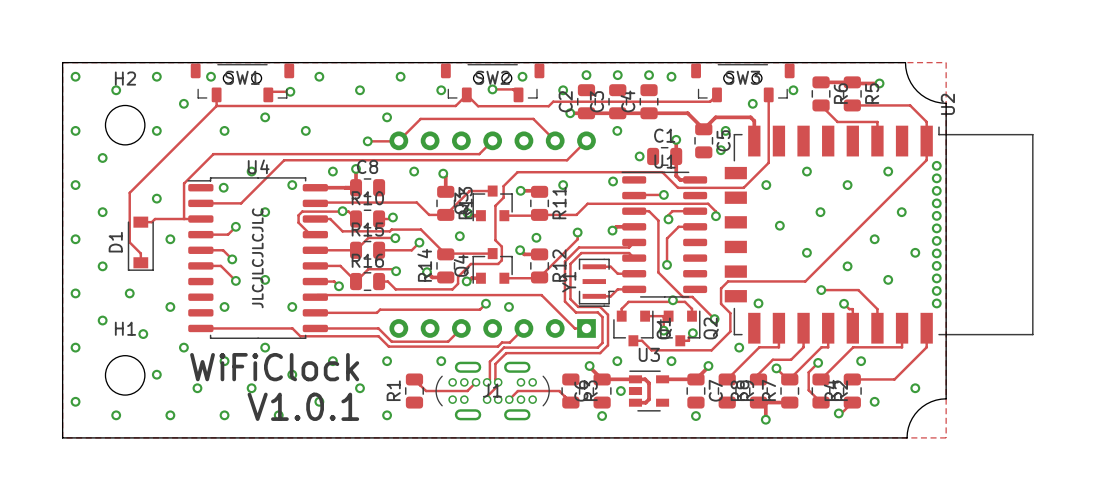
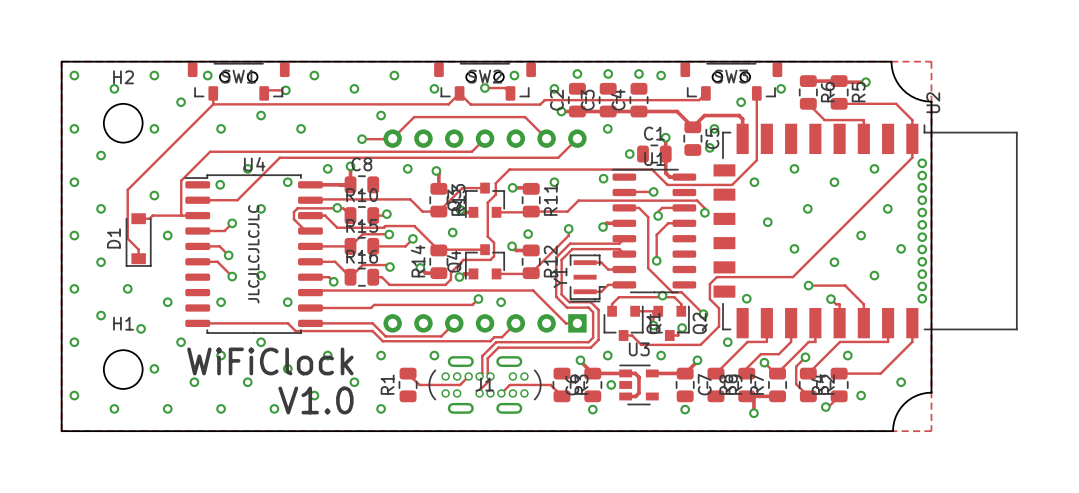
text: V1.0.1 (303, 406) -> V1.0 (315, 400)

